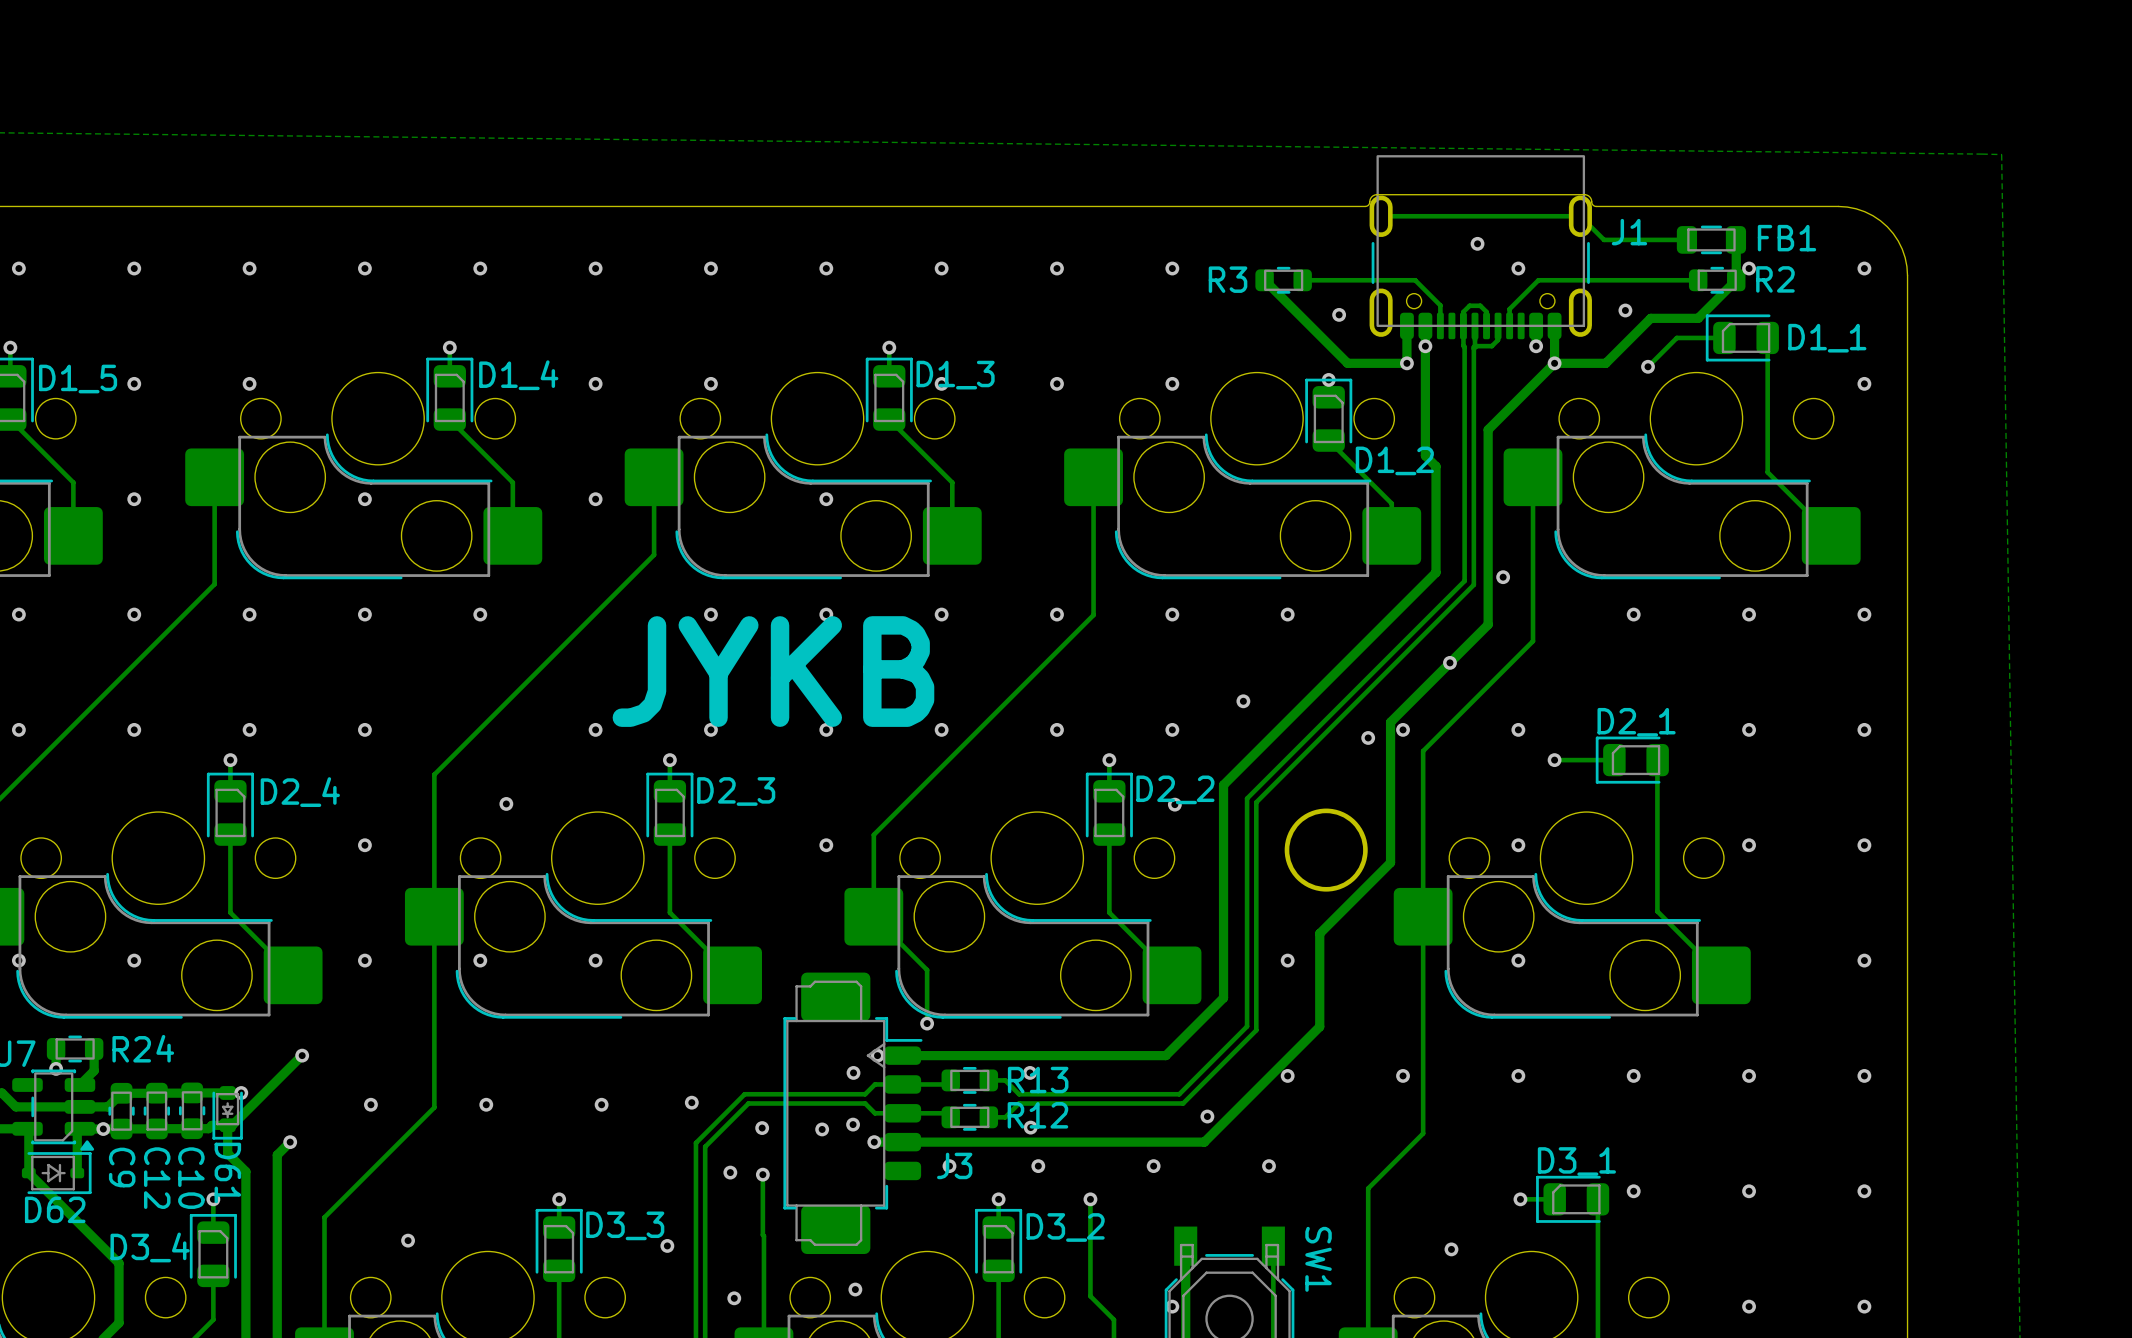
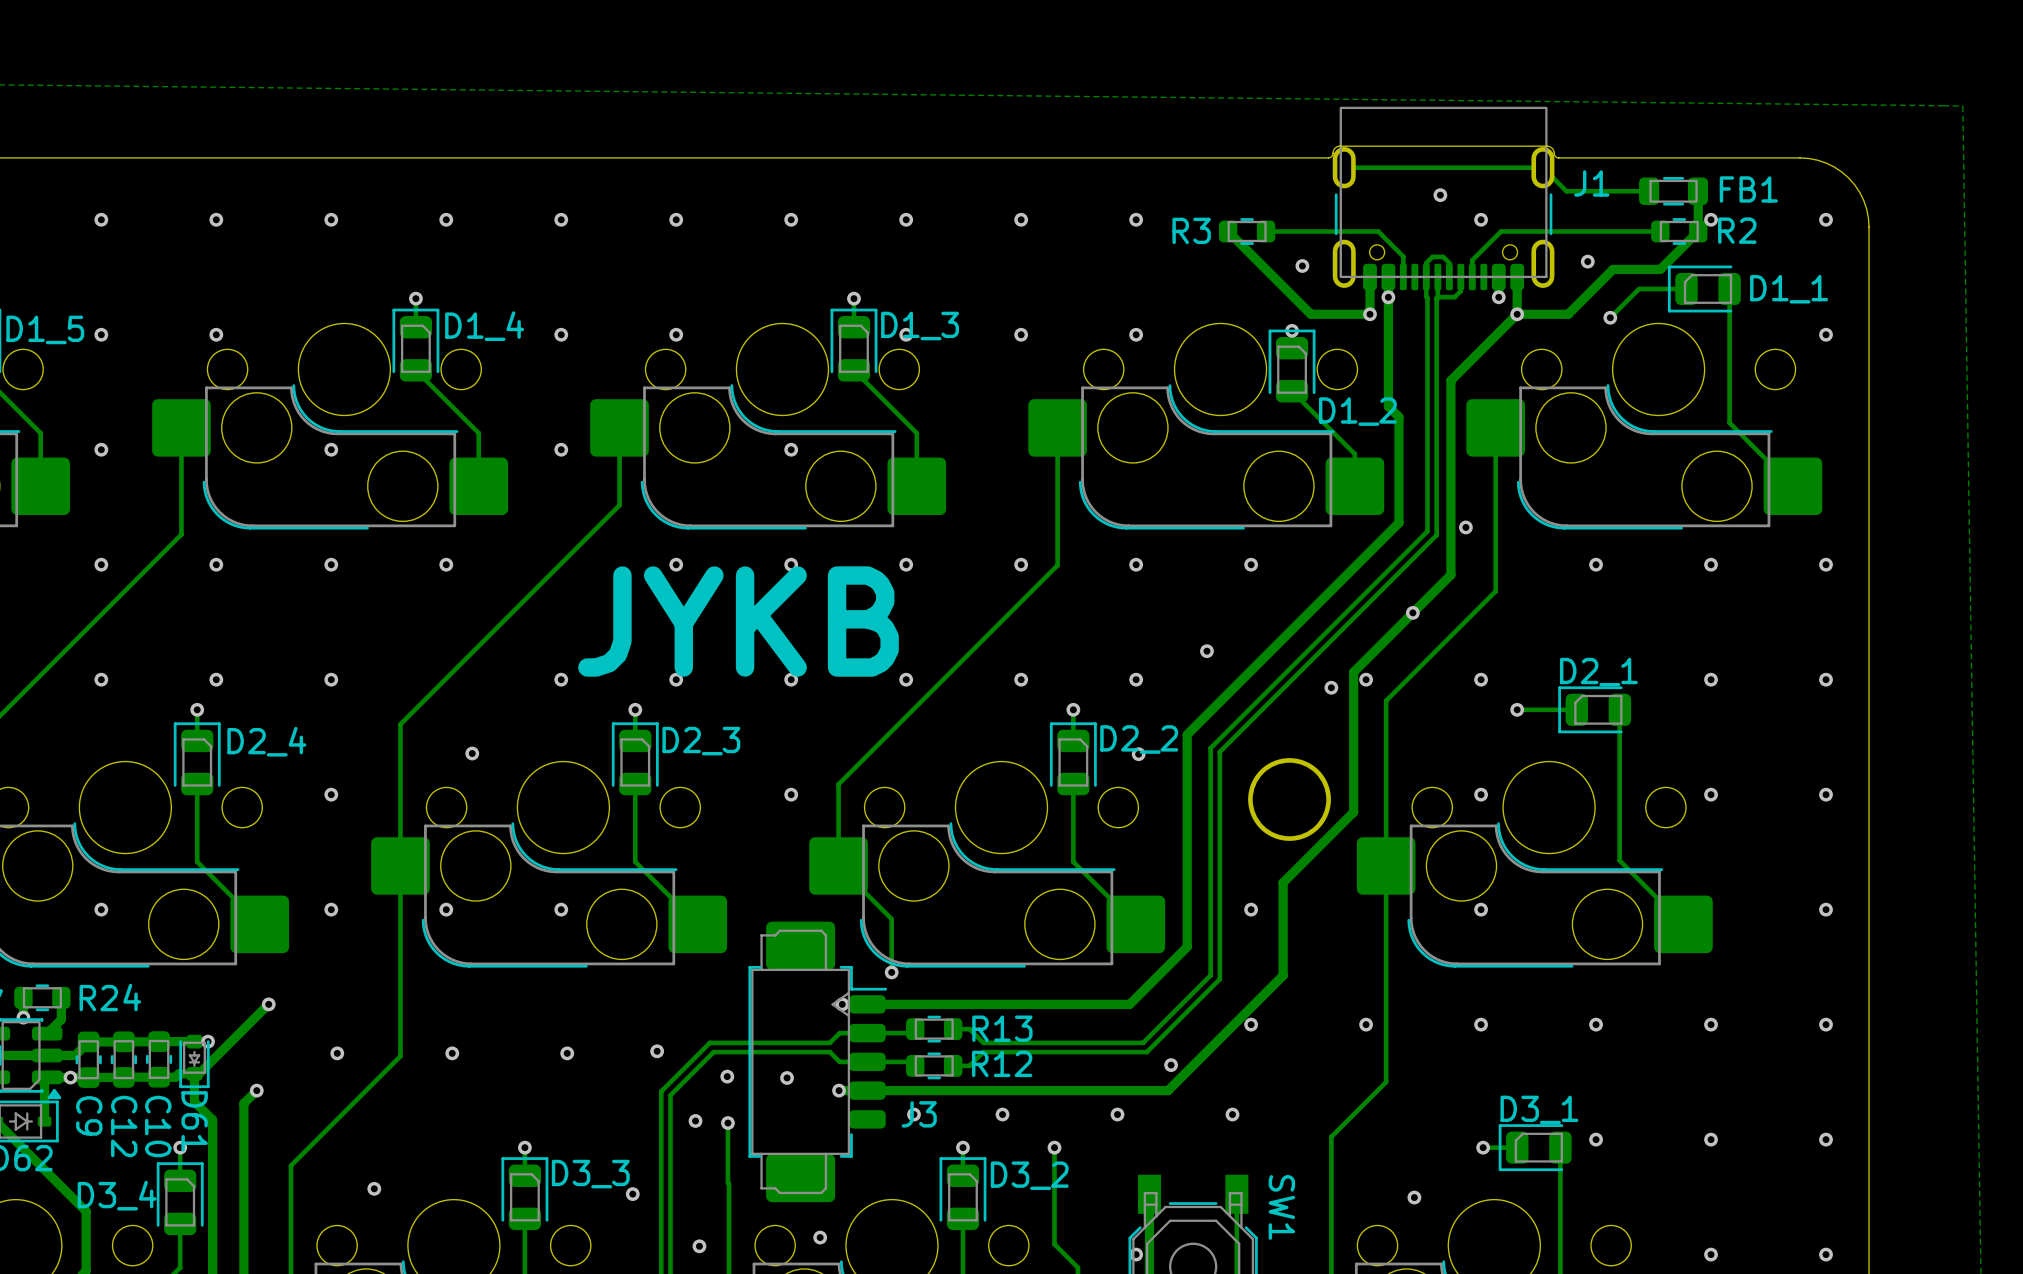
via: (853, 1072) -> none
via: (1030, 1072) -> none
via: (853, 1124) -> none
via: (1030, 1127) -> none

